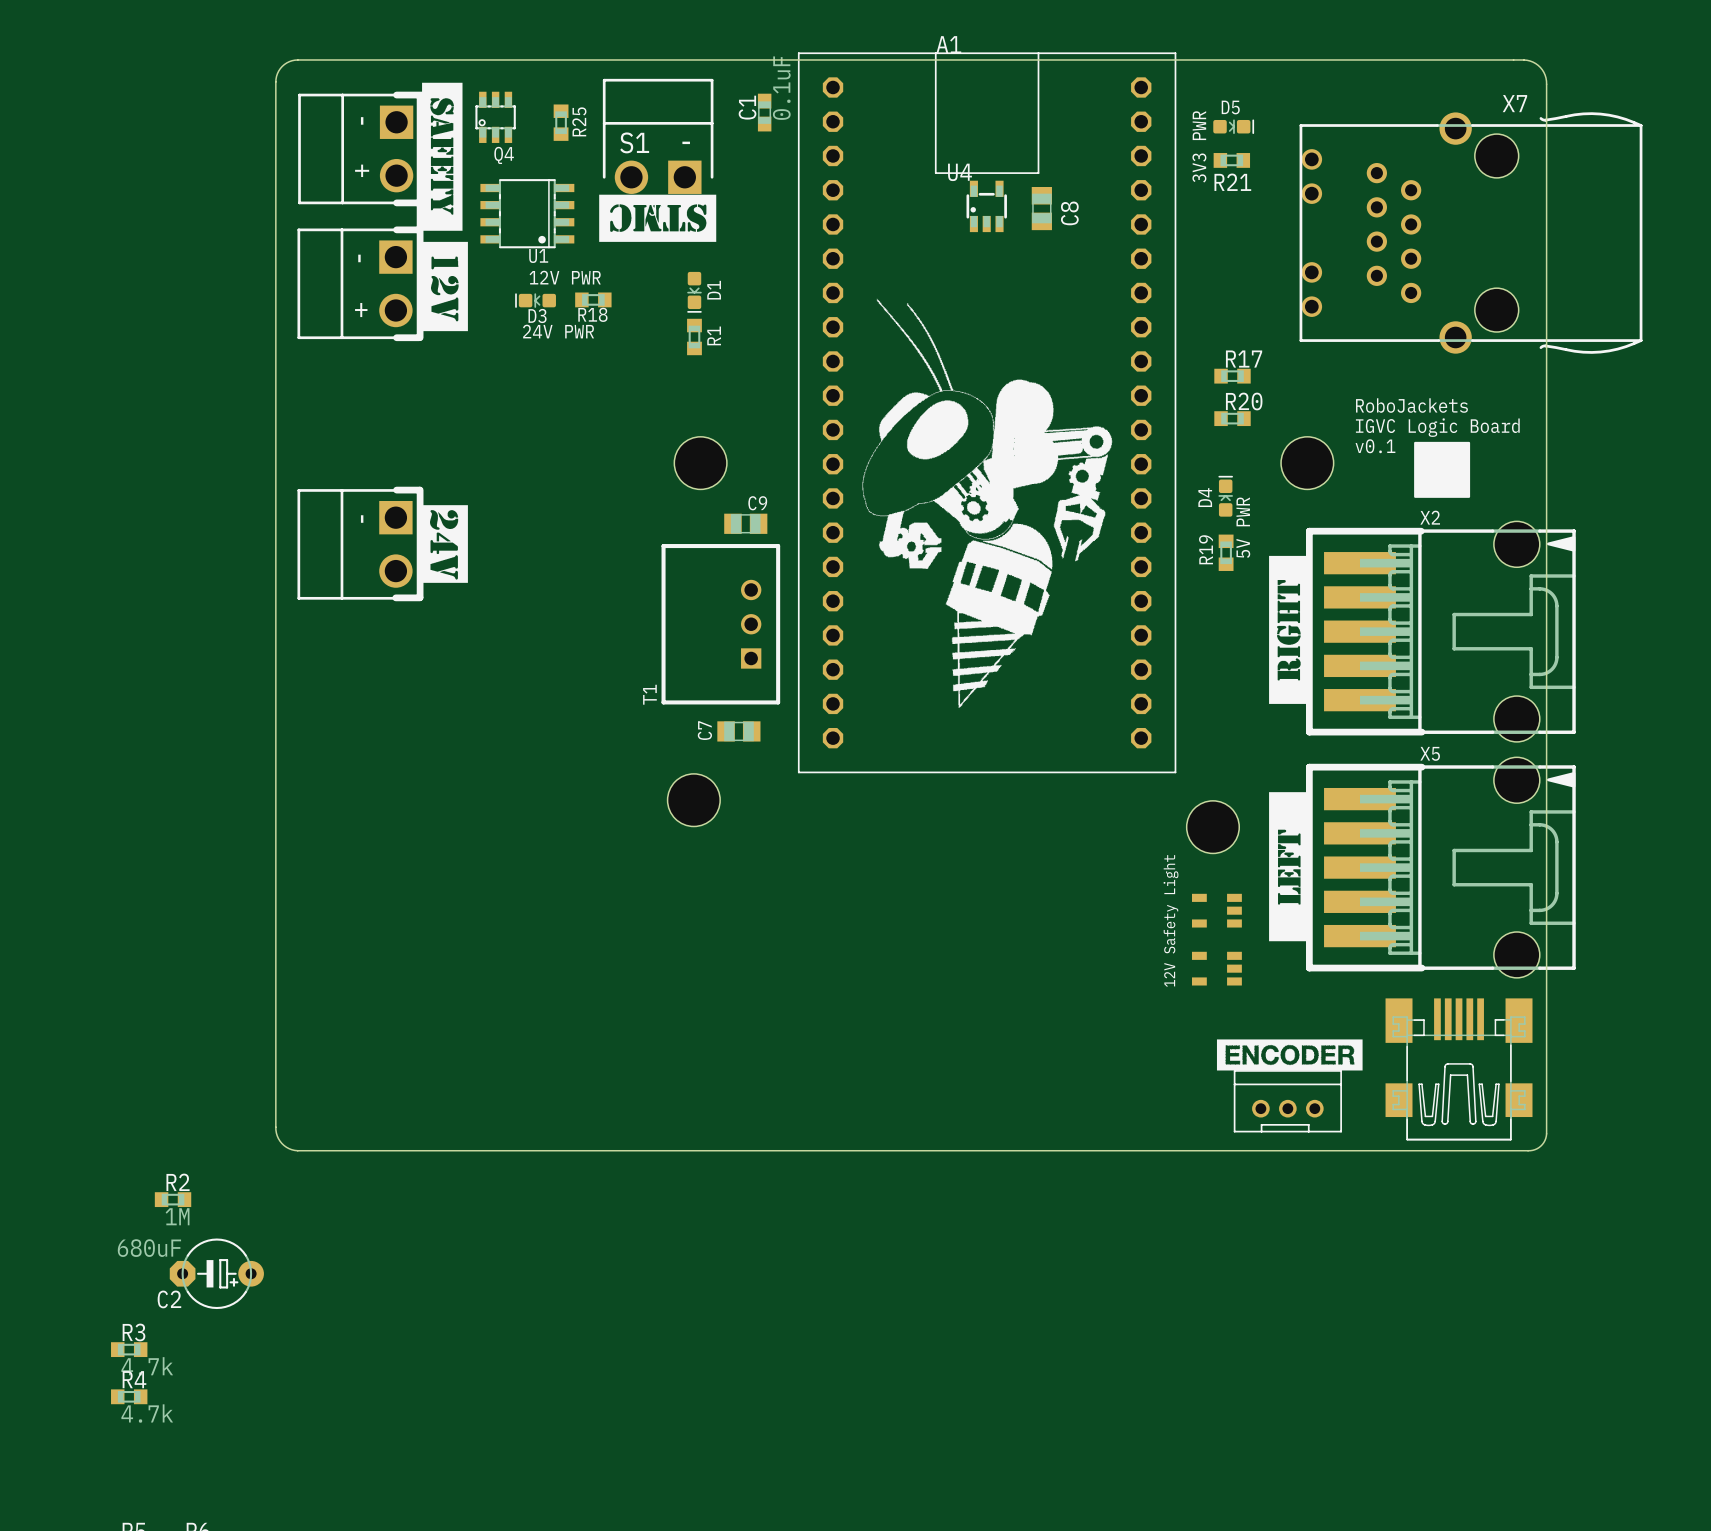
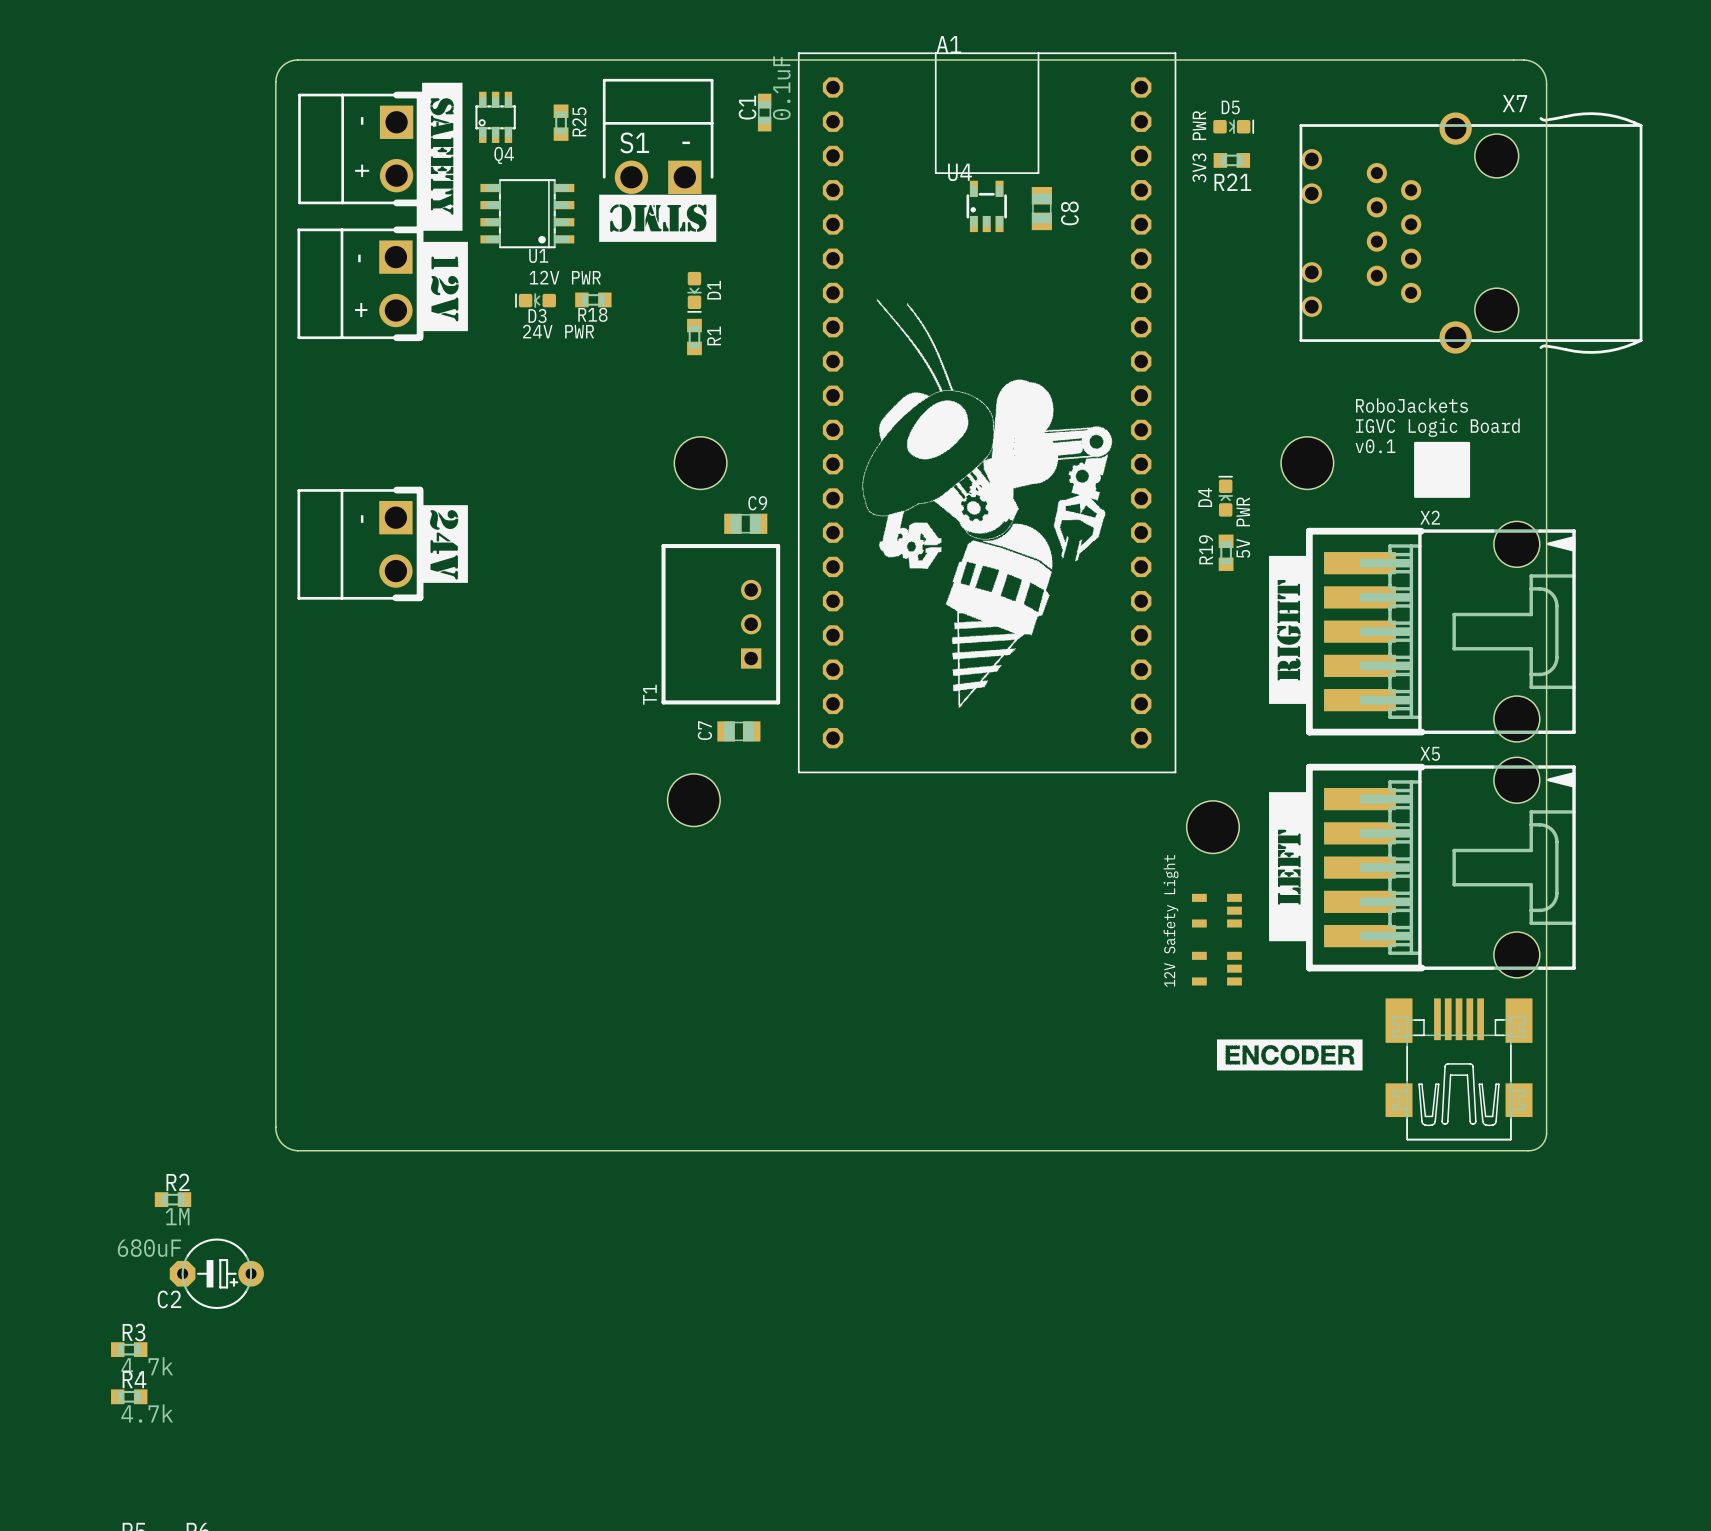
R17: (1232, 376) -> none
R20: (1232, 418) -> none
part: (1287, 1101) -> none

